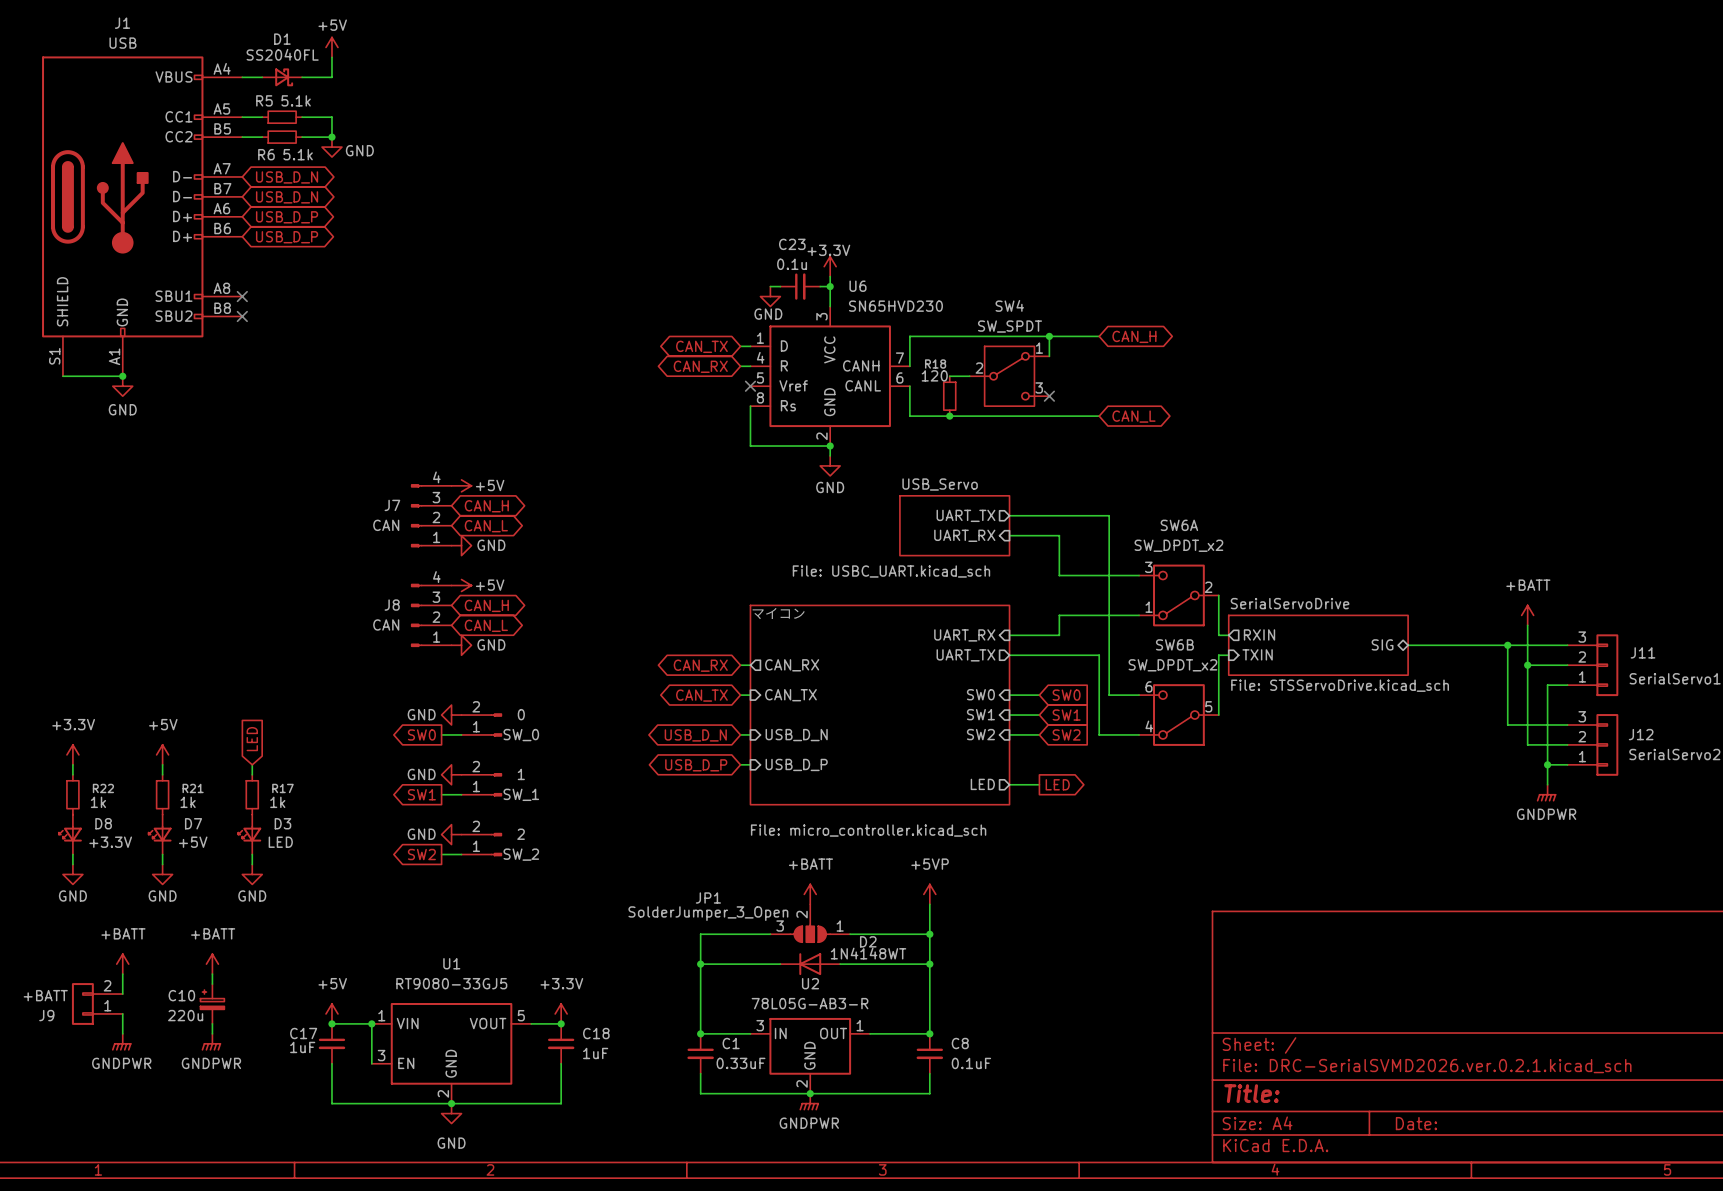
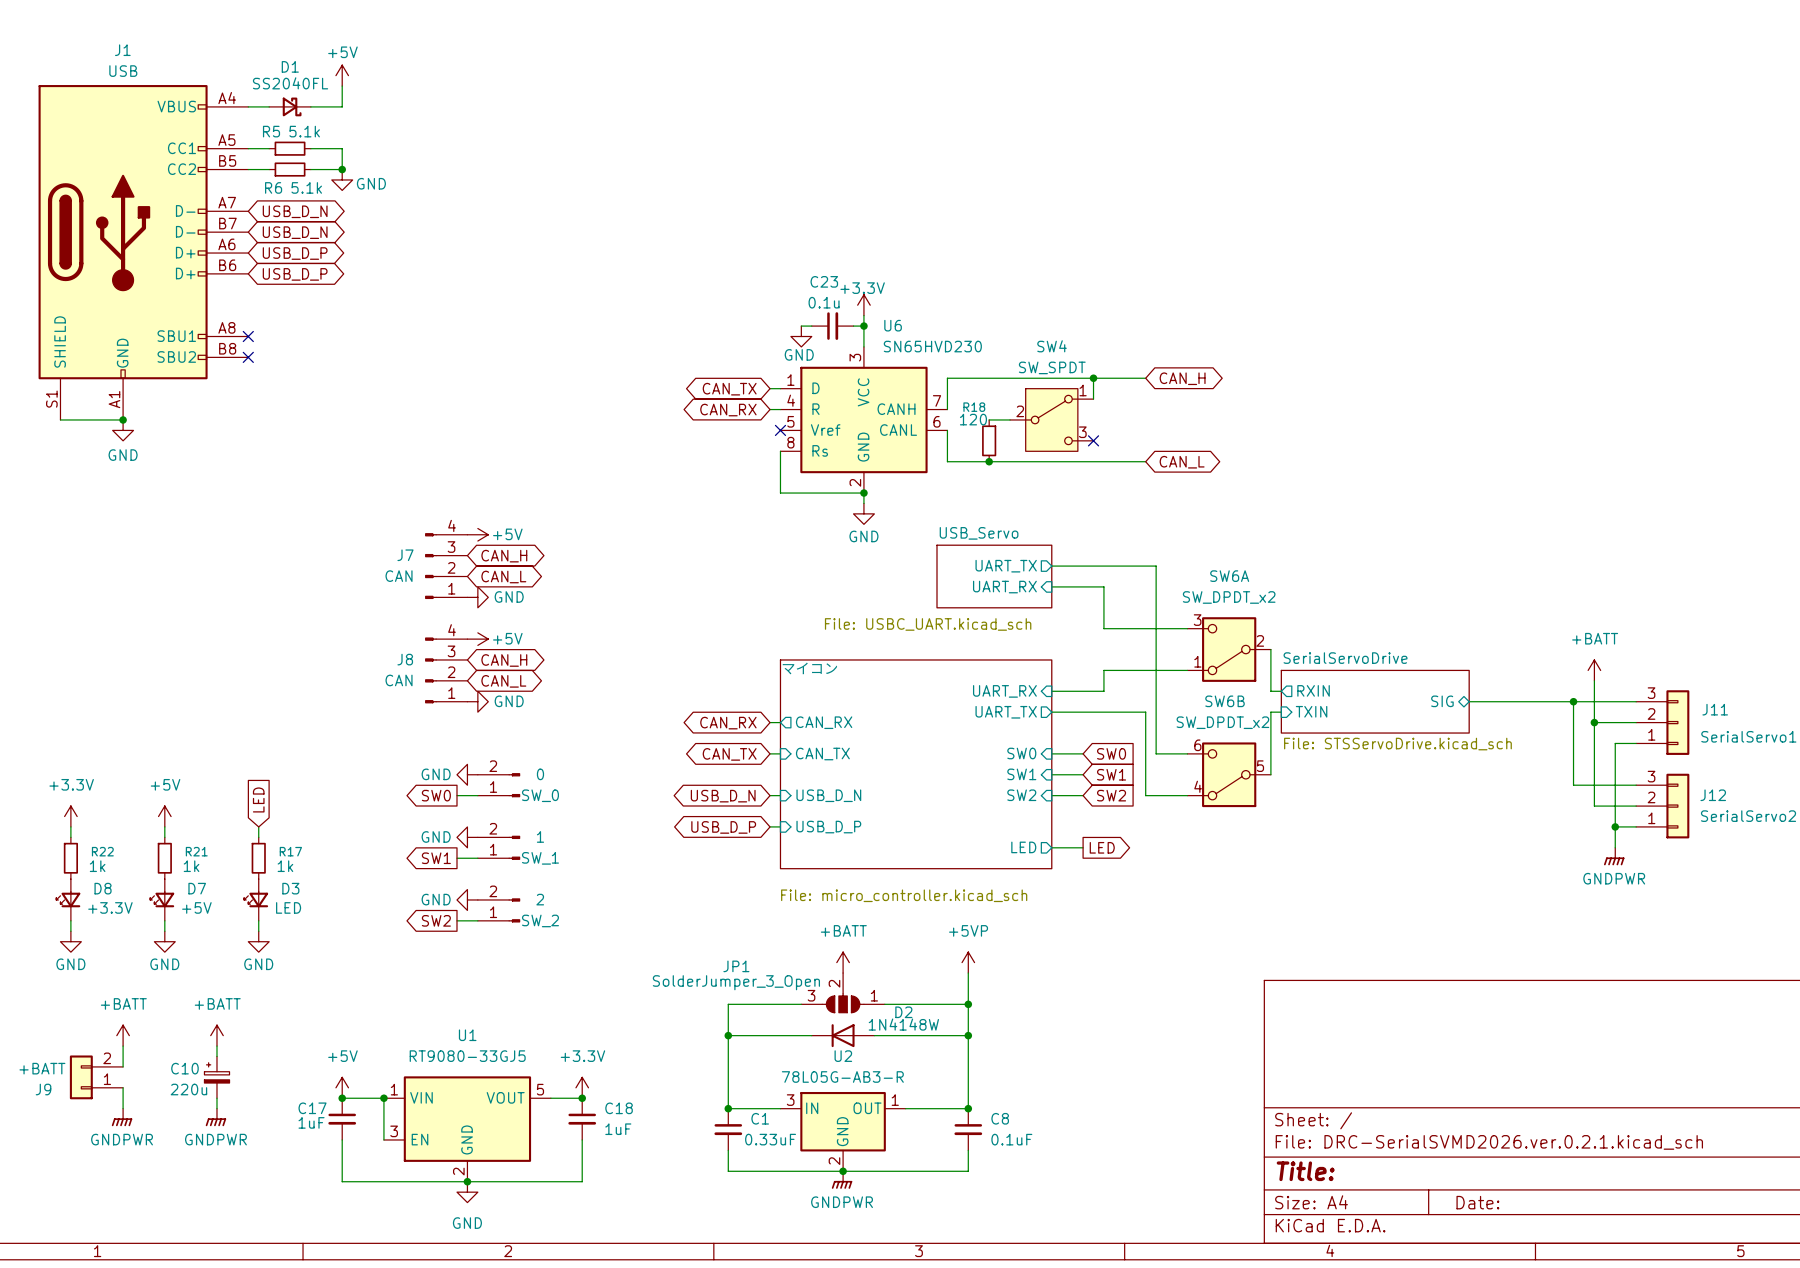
D2 value: 1N4148WT (868, 953) -> 1N4148W (903, 1024)

